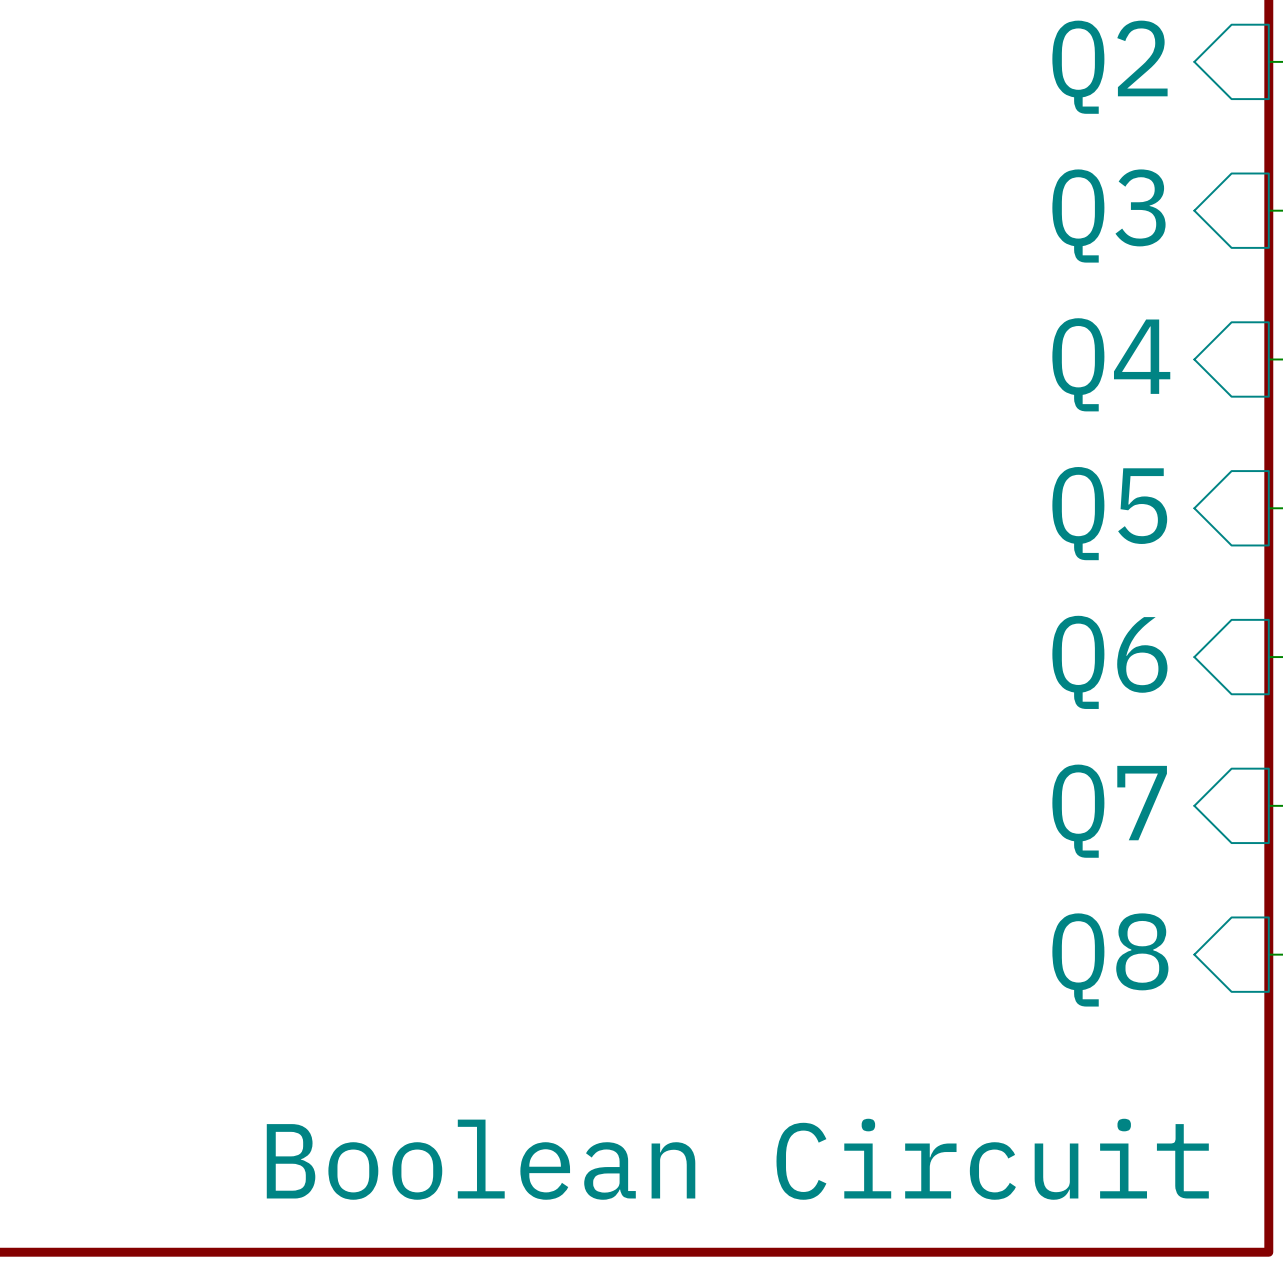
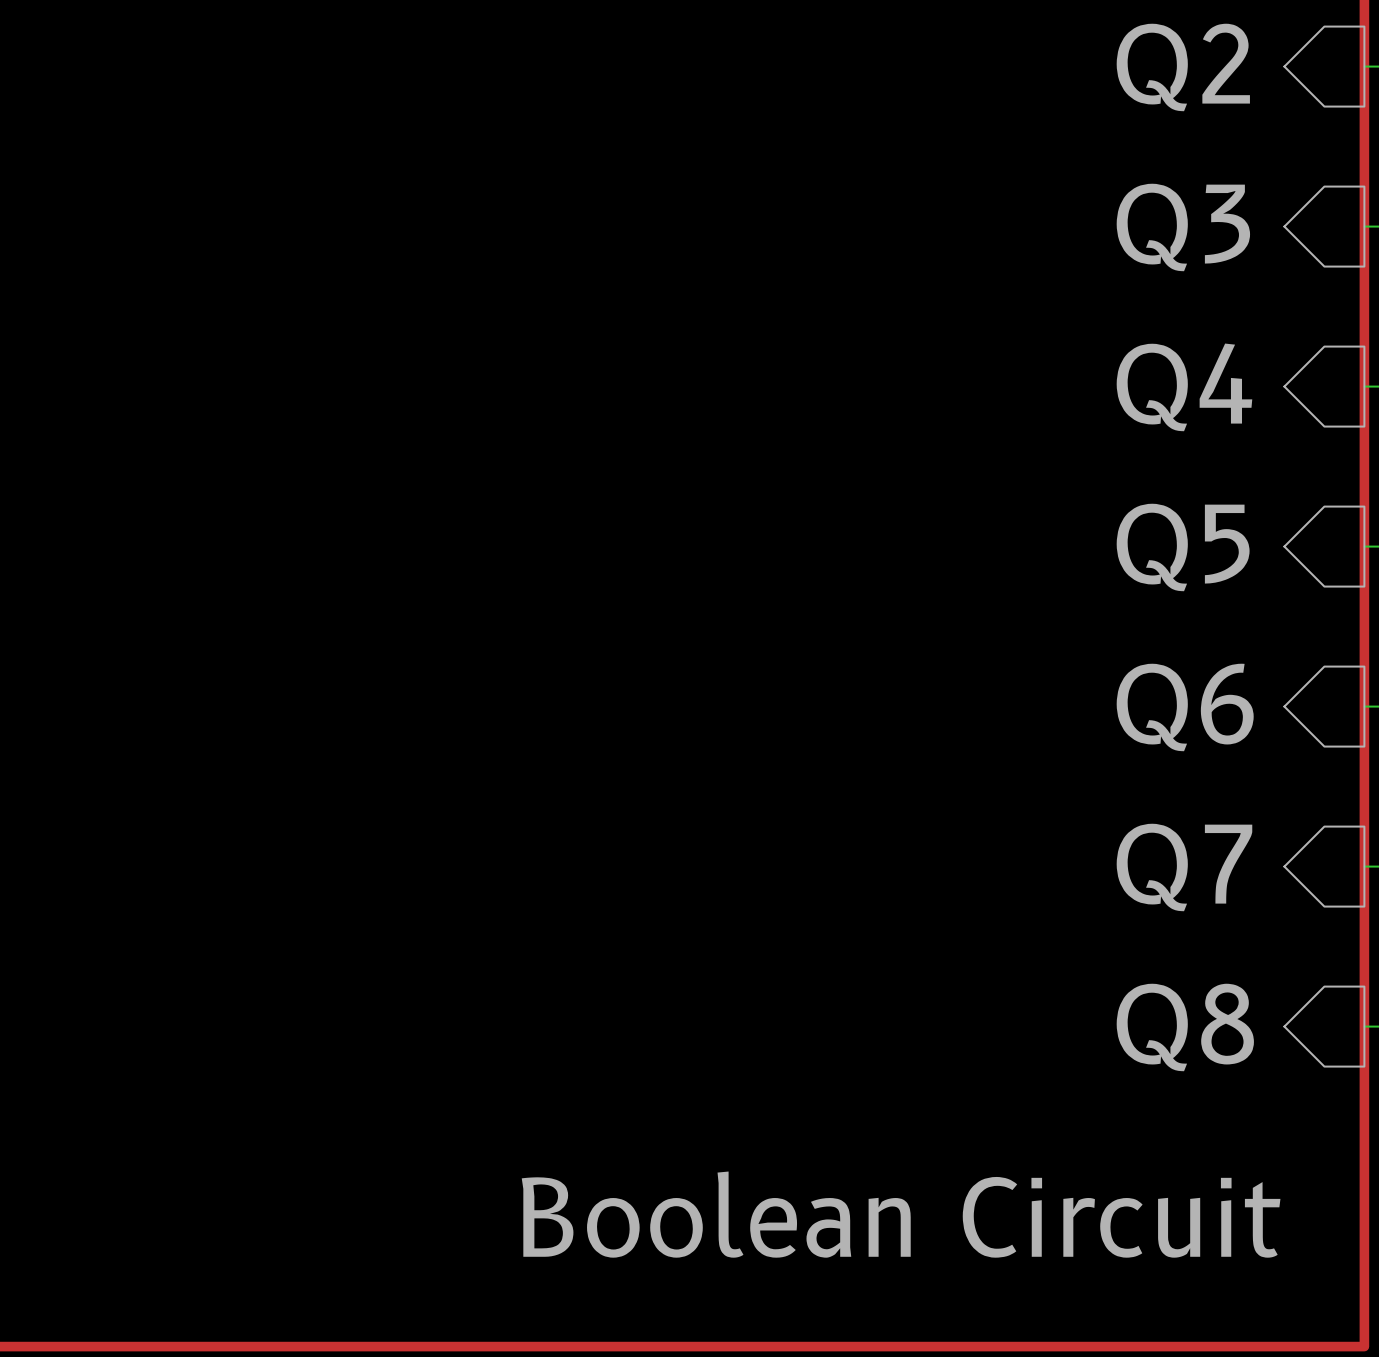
sheet Boolean Circuit name position: Boolean Circuit (737, 1159) -> Boolean Circuit (901, 1214)

